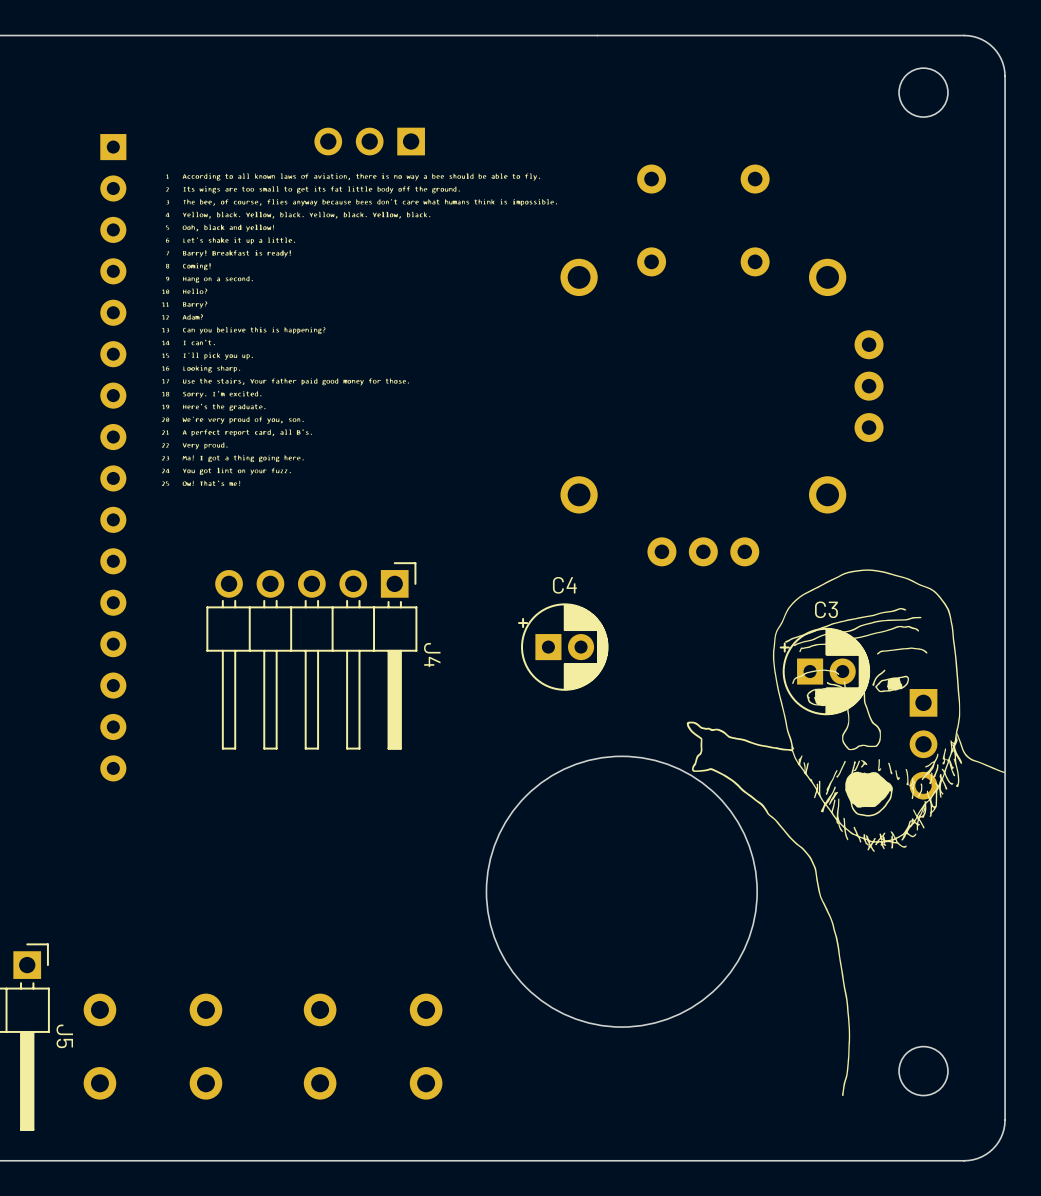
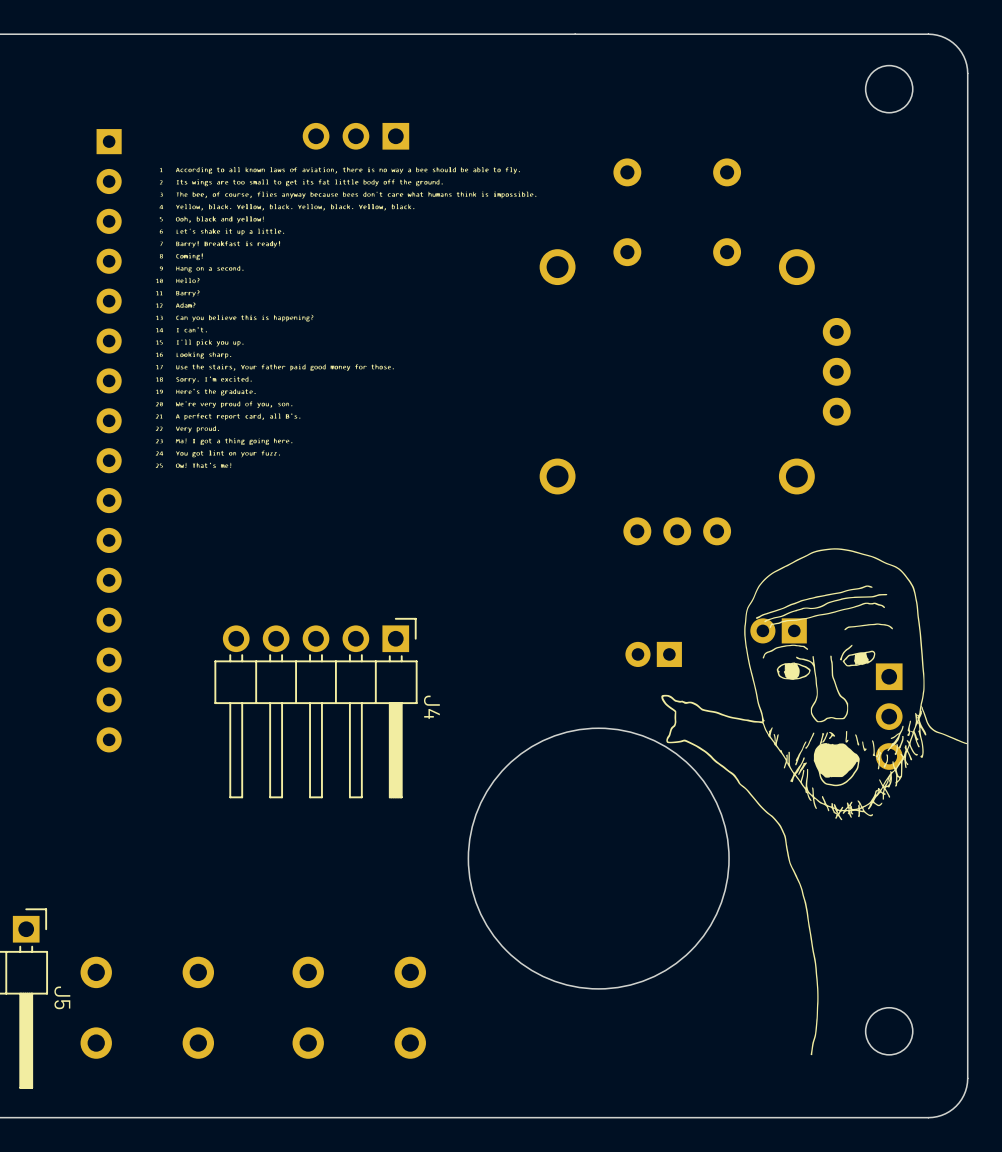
C4 side: bottom (563, 647) -> top (653, 654)
J4 position: (311, 655) -> (316, 708)
C3 side: bottom (824, 671) -> top (778, 630)

